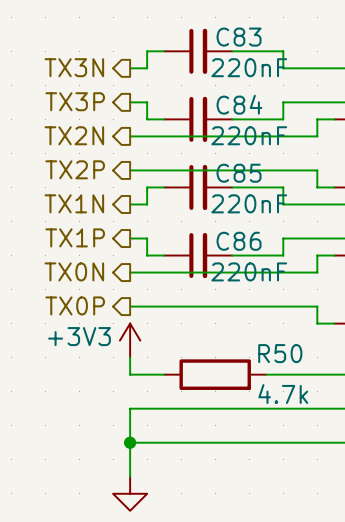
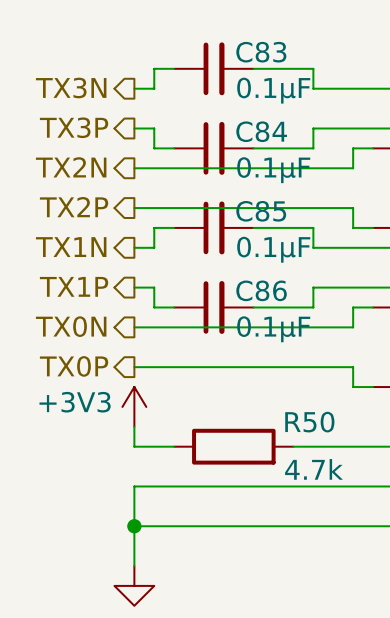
C83 value: 220nF (249, 67) -> 0.1µF (273, 90)
C84 value: 220nF (249, 135) -> 0.1µF (273, 170)
C85 value: 220nF (249, 203) -> 0.1µF (273, 249)
C86 value: 220nF (249, 271) -> 0.1µF (273, 329)

